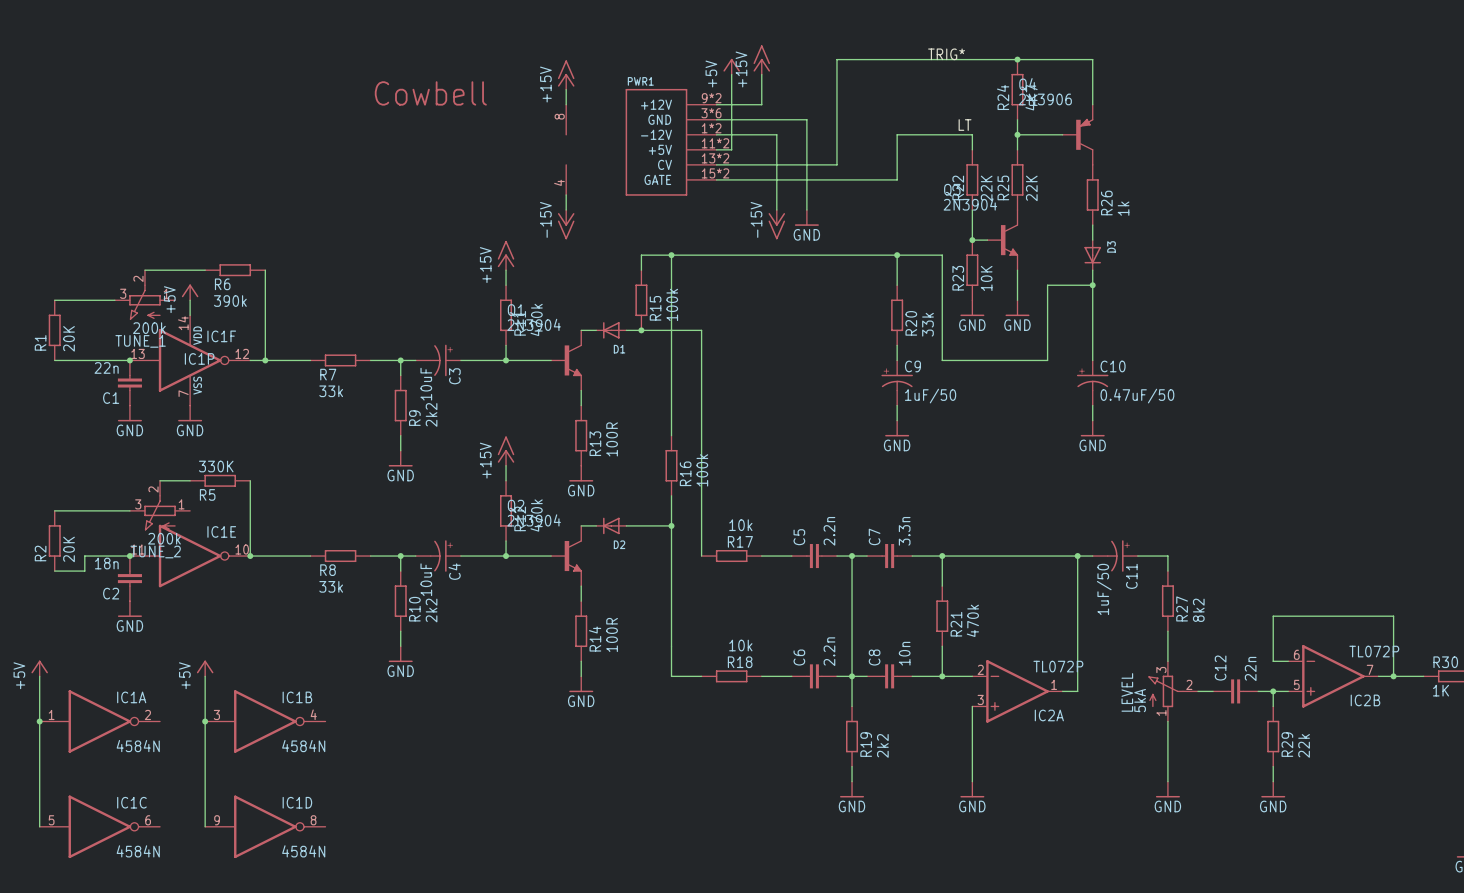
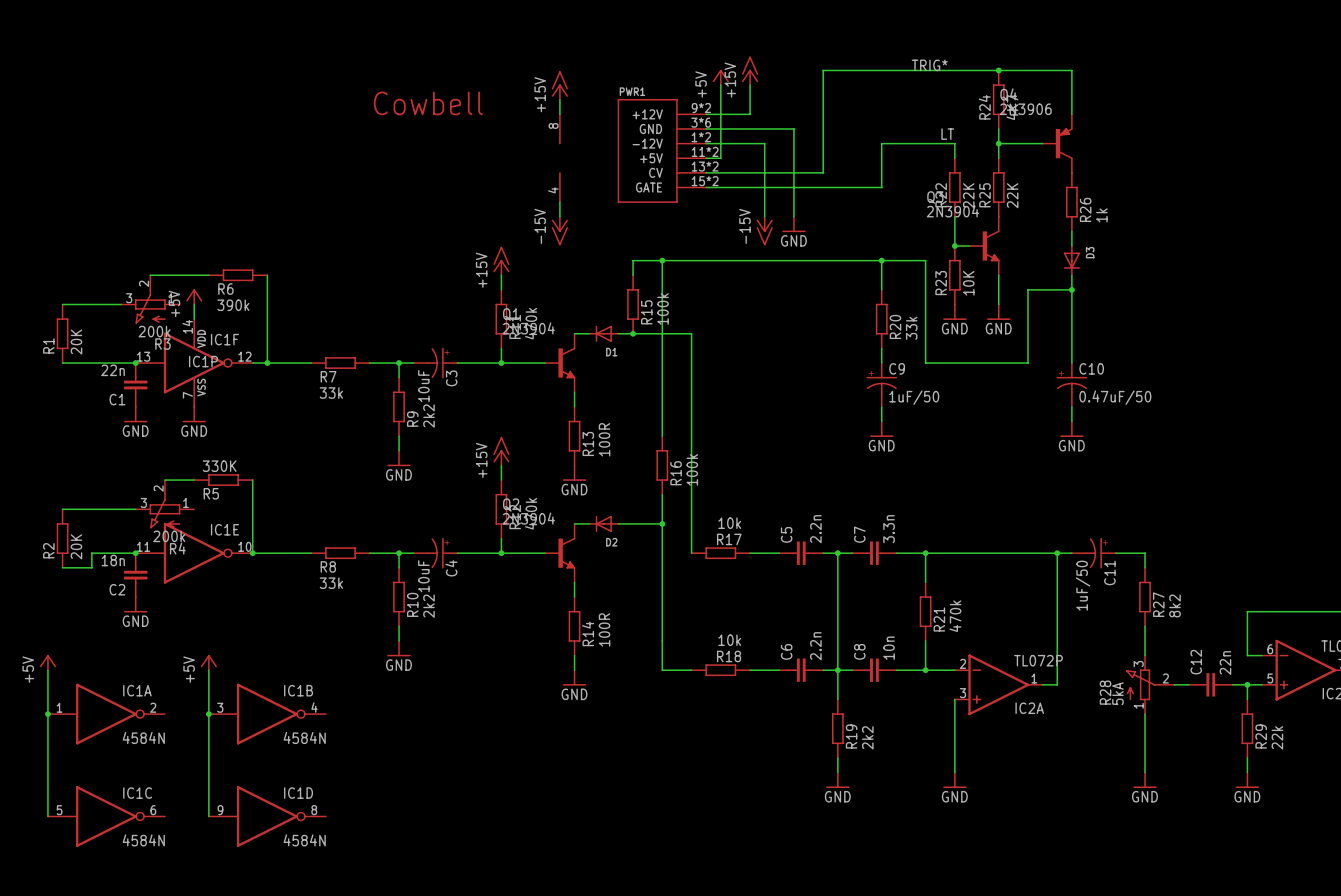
TUNE_1 name: TUNE_1 (140, 341) -> R3 (162, 344)
TUNE_2 name: TUNE_2 (155, 552) -> R4 (177, 548)
LEVEL name: LEVEL (1127, 692) -> R28 (1105, 692)

